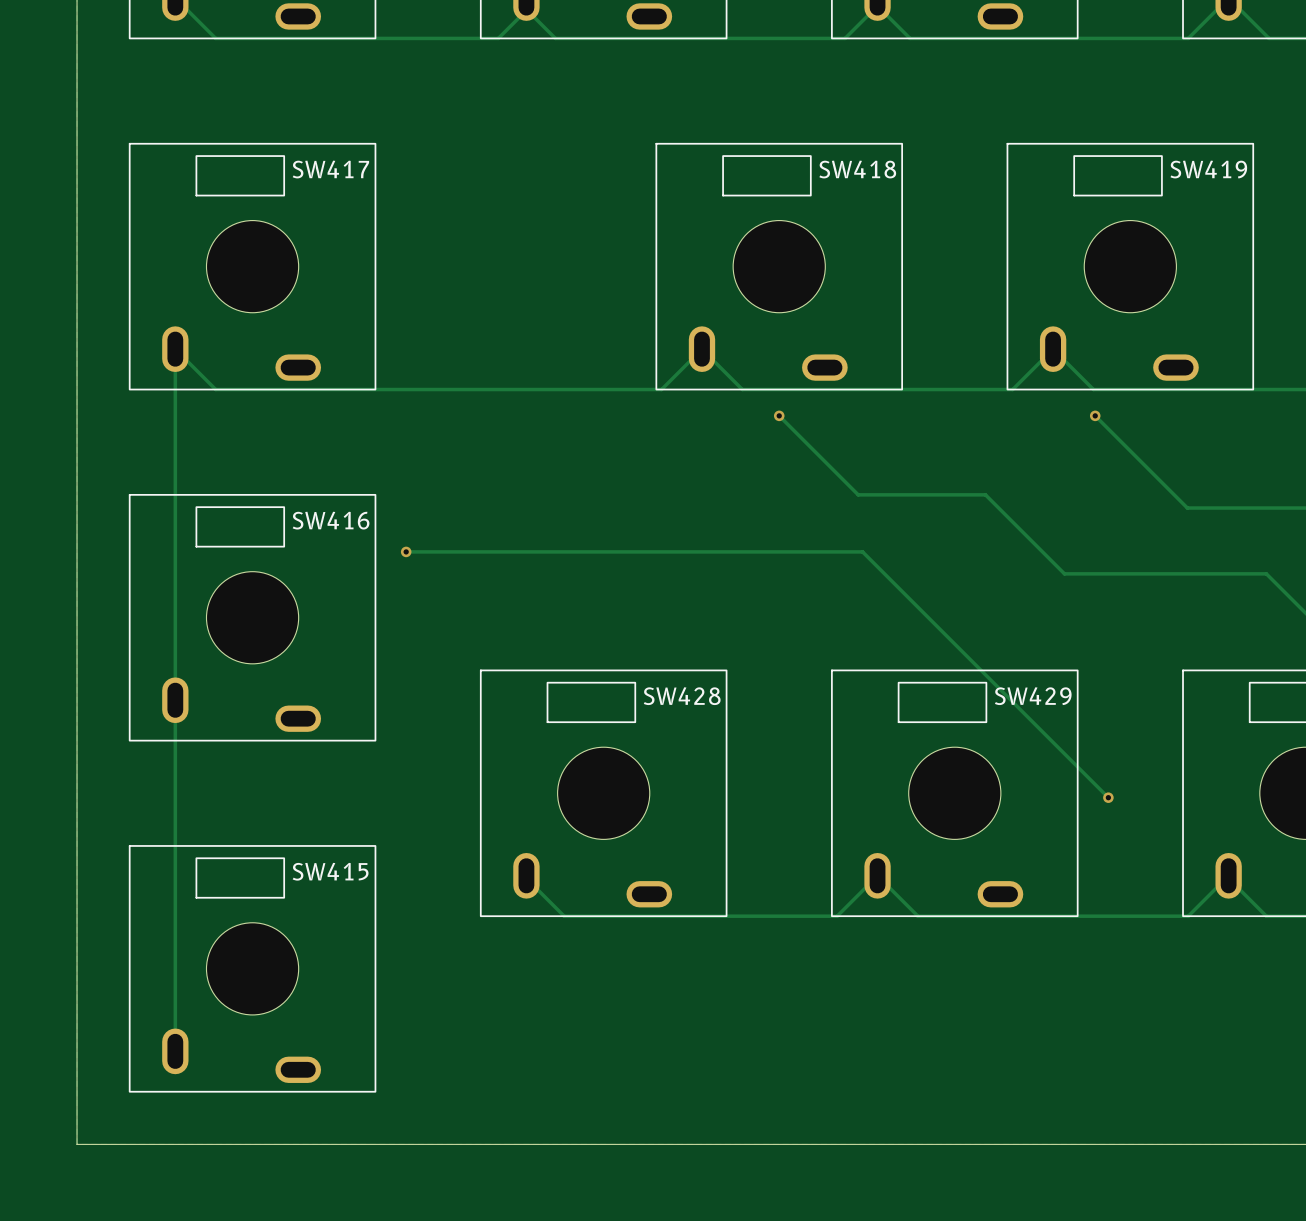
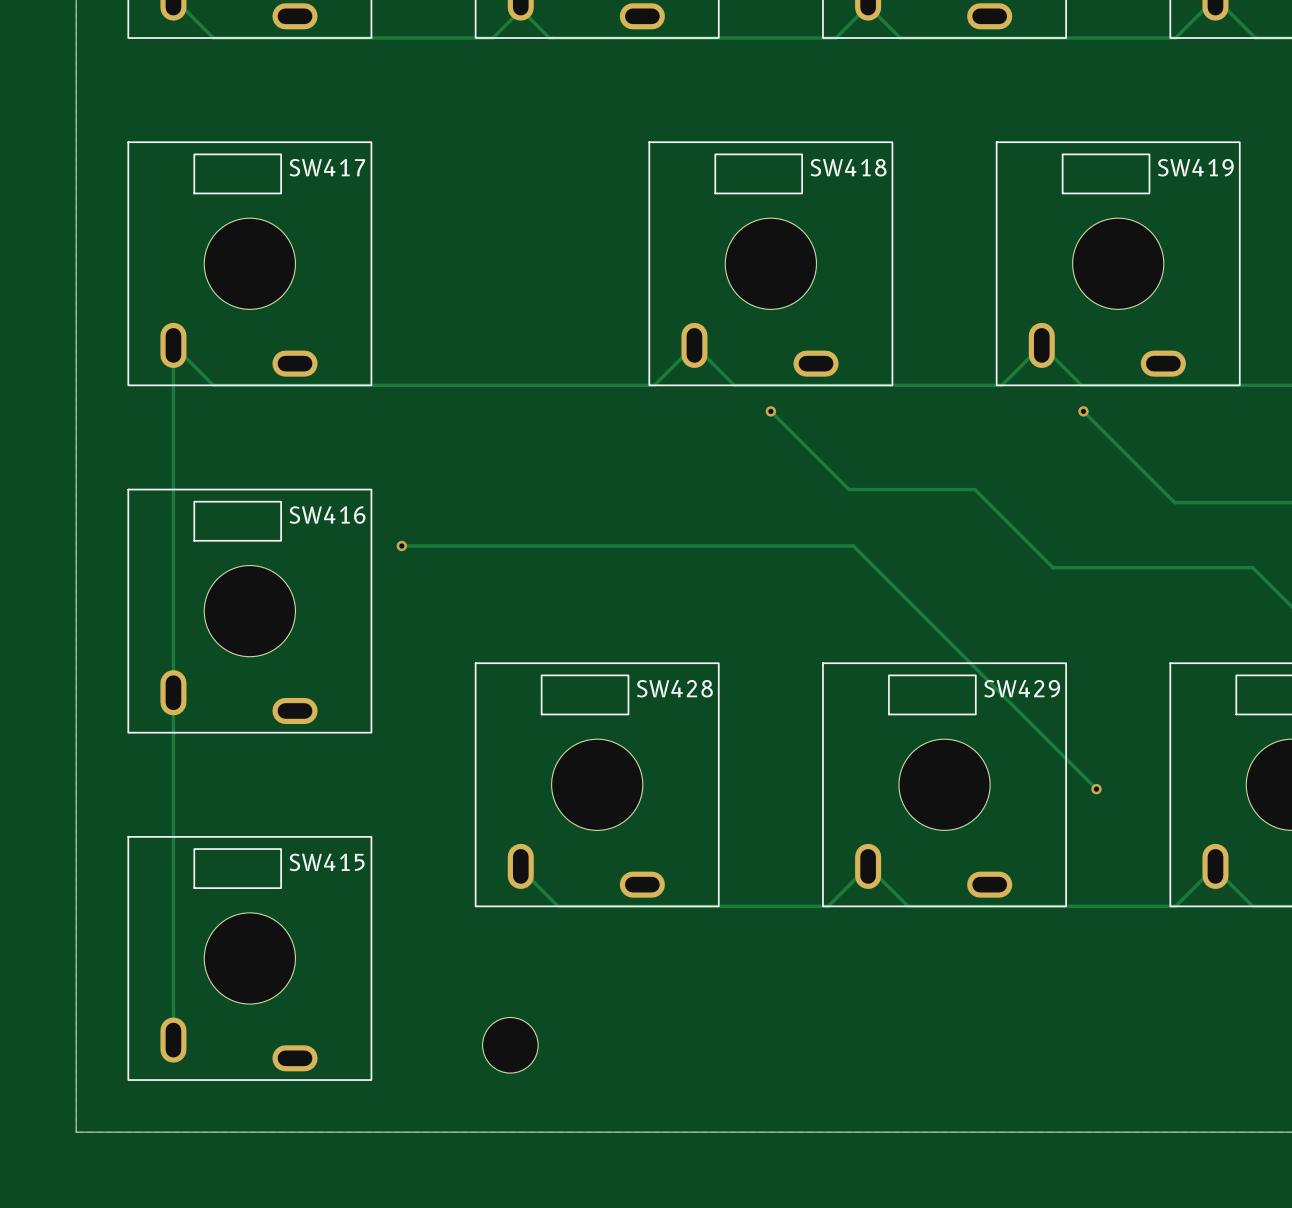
part: none -> (510, 1045)

